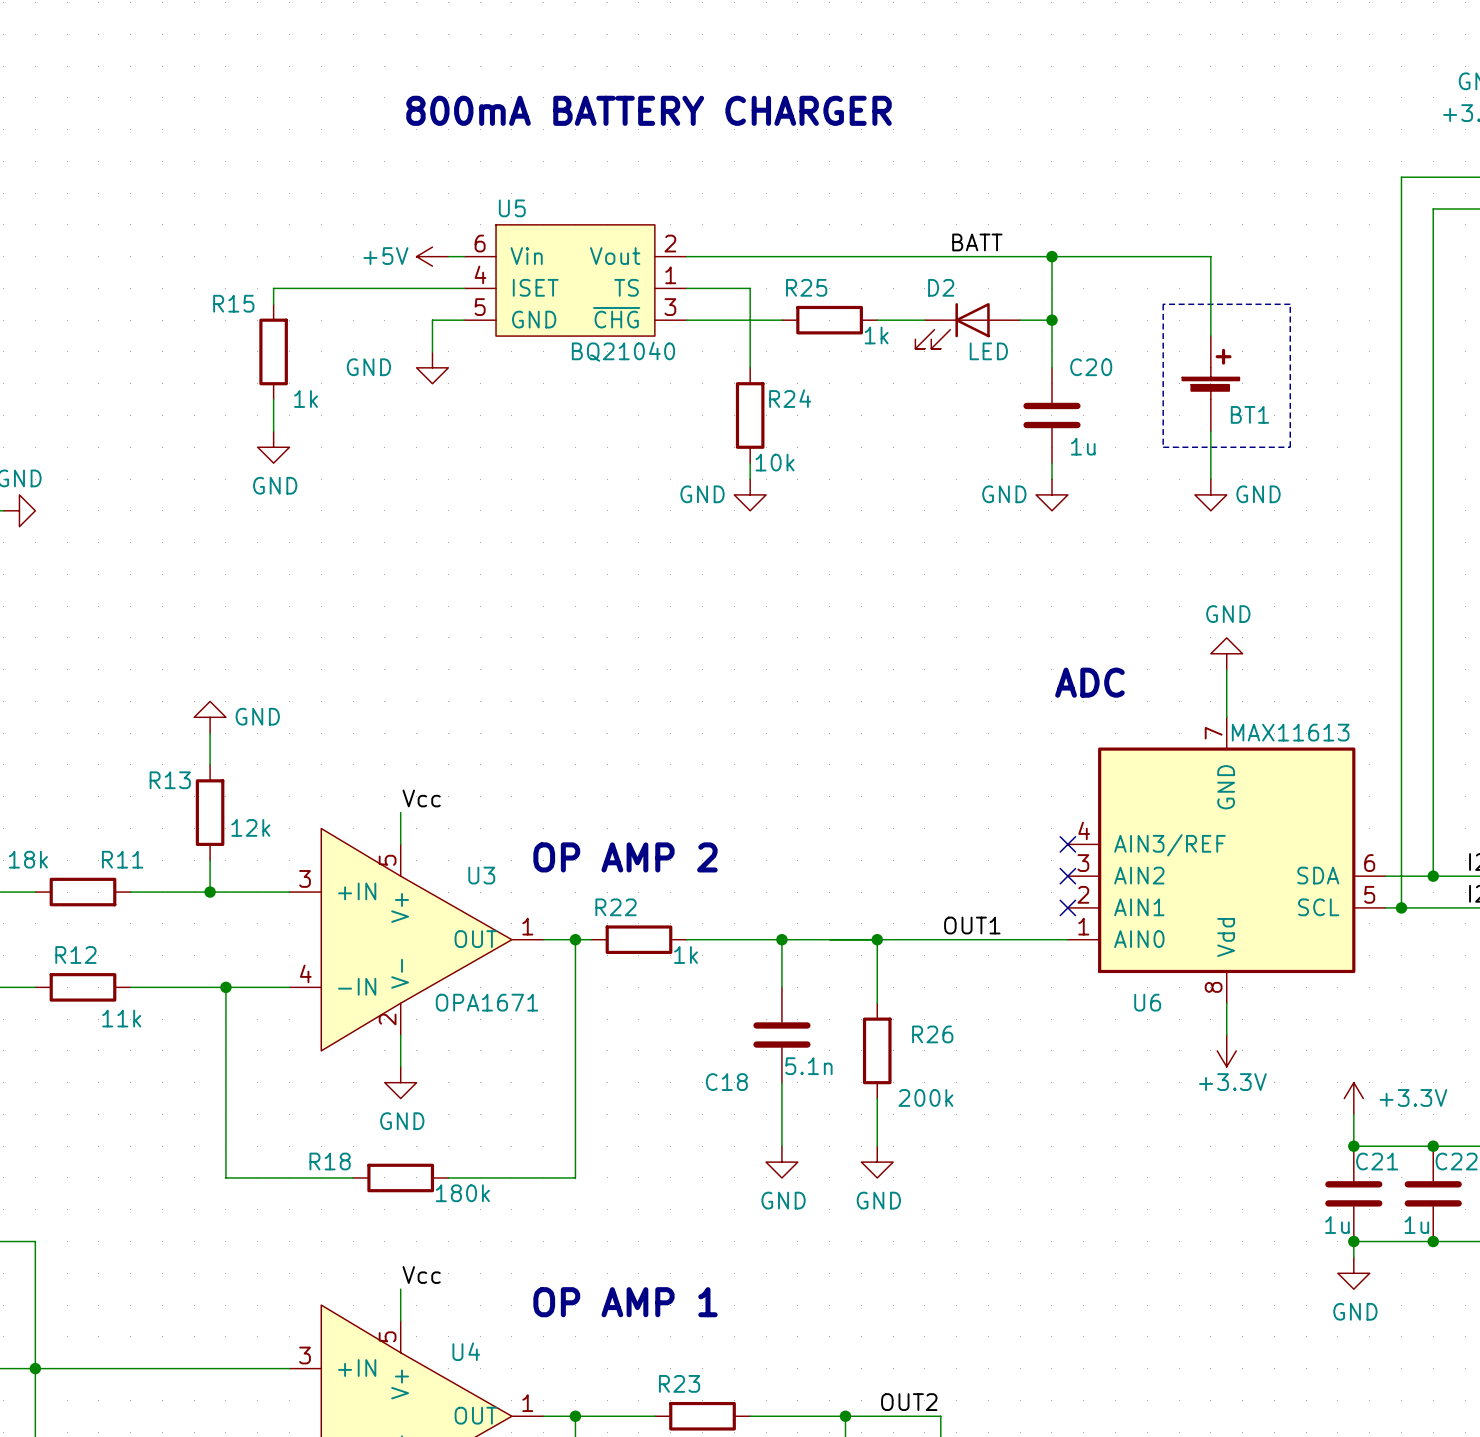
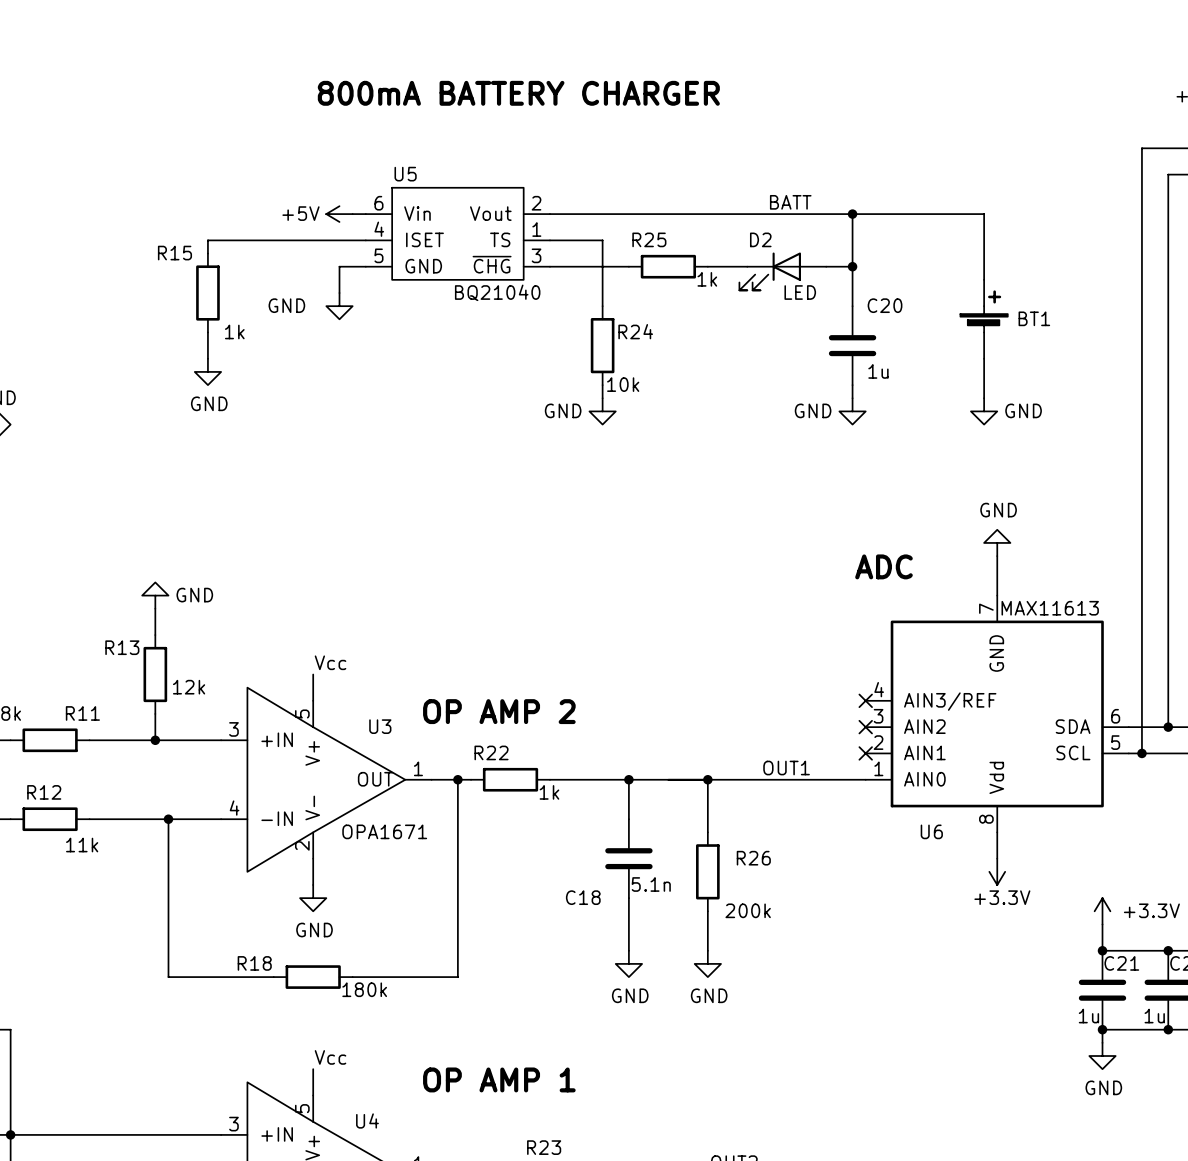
line: (1163, 304) (1290, 304) (1290, 447) (1163, 447) (1163, 304) -> none
BT1 name position: BT1 (1249, 414) -> BT1 (1034, 318)

